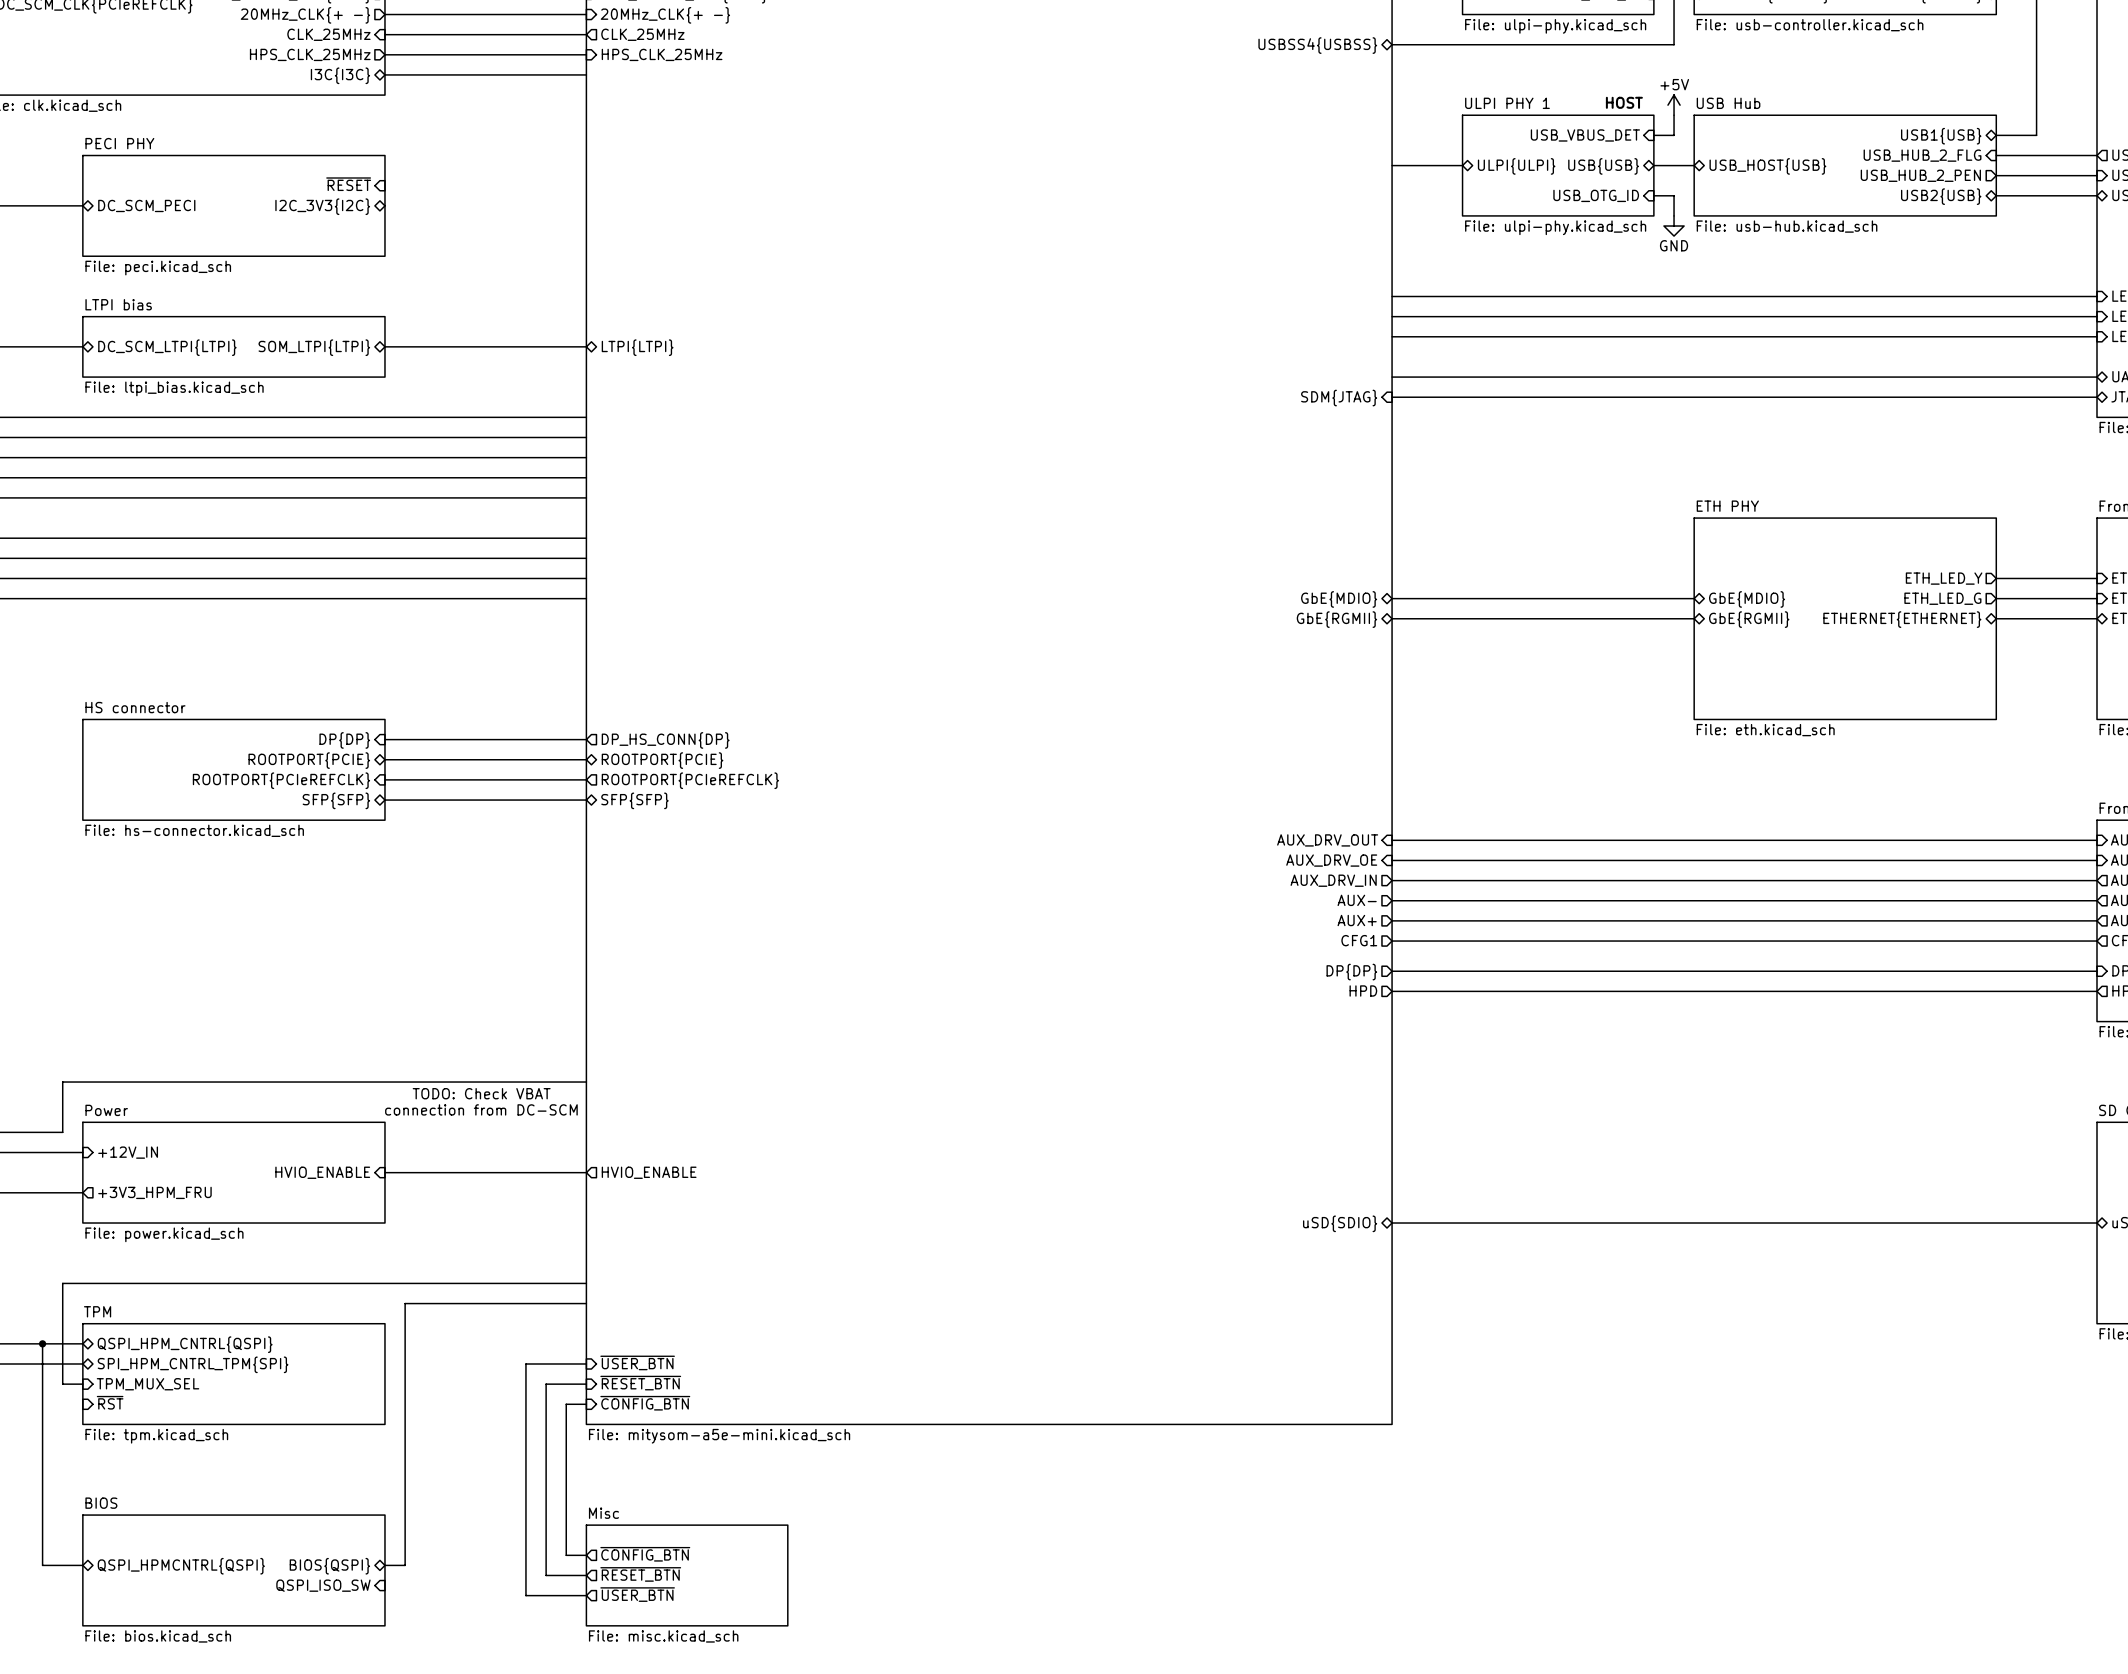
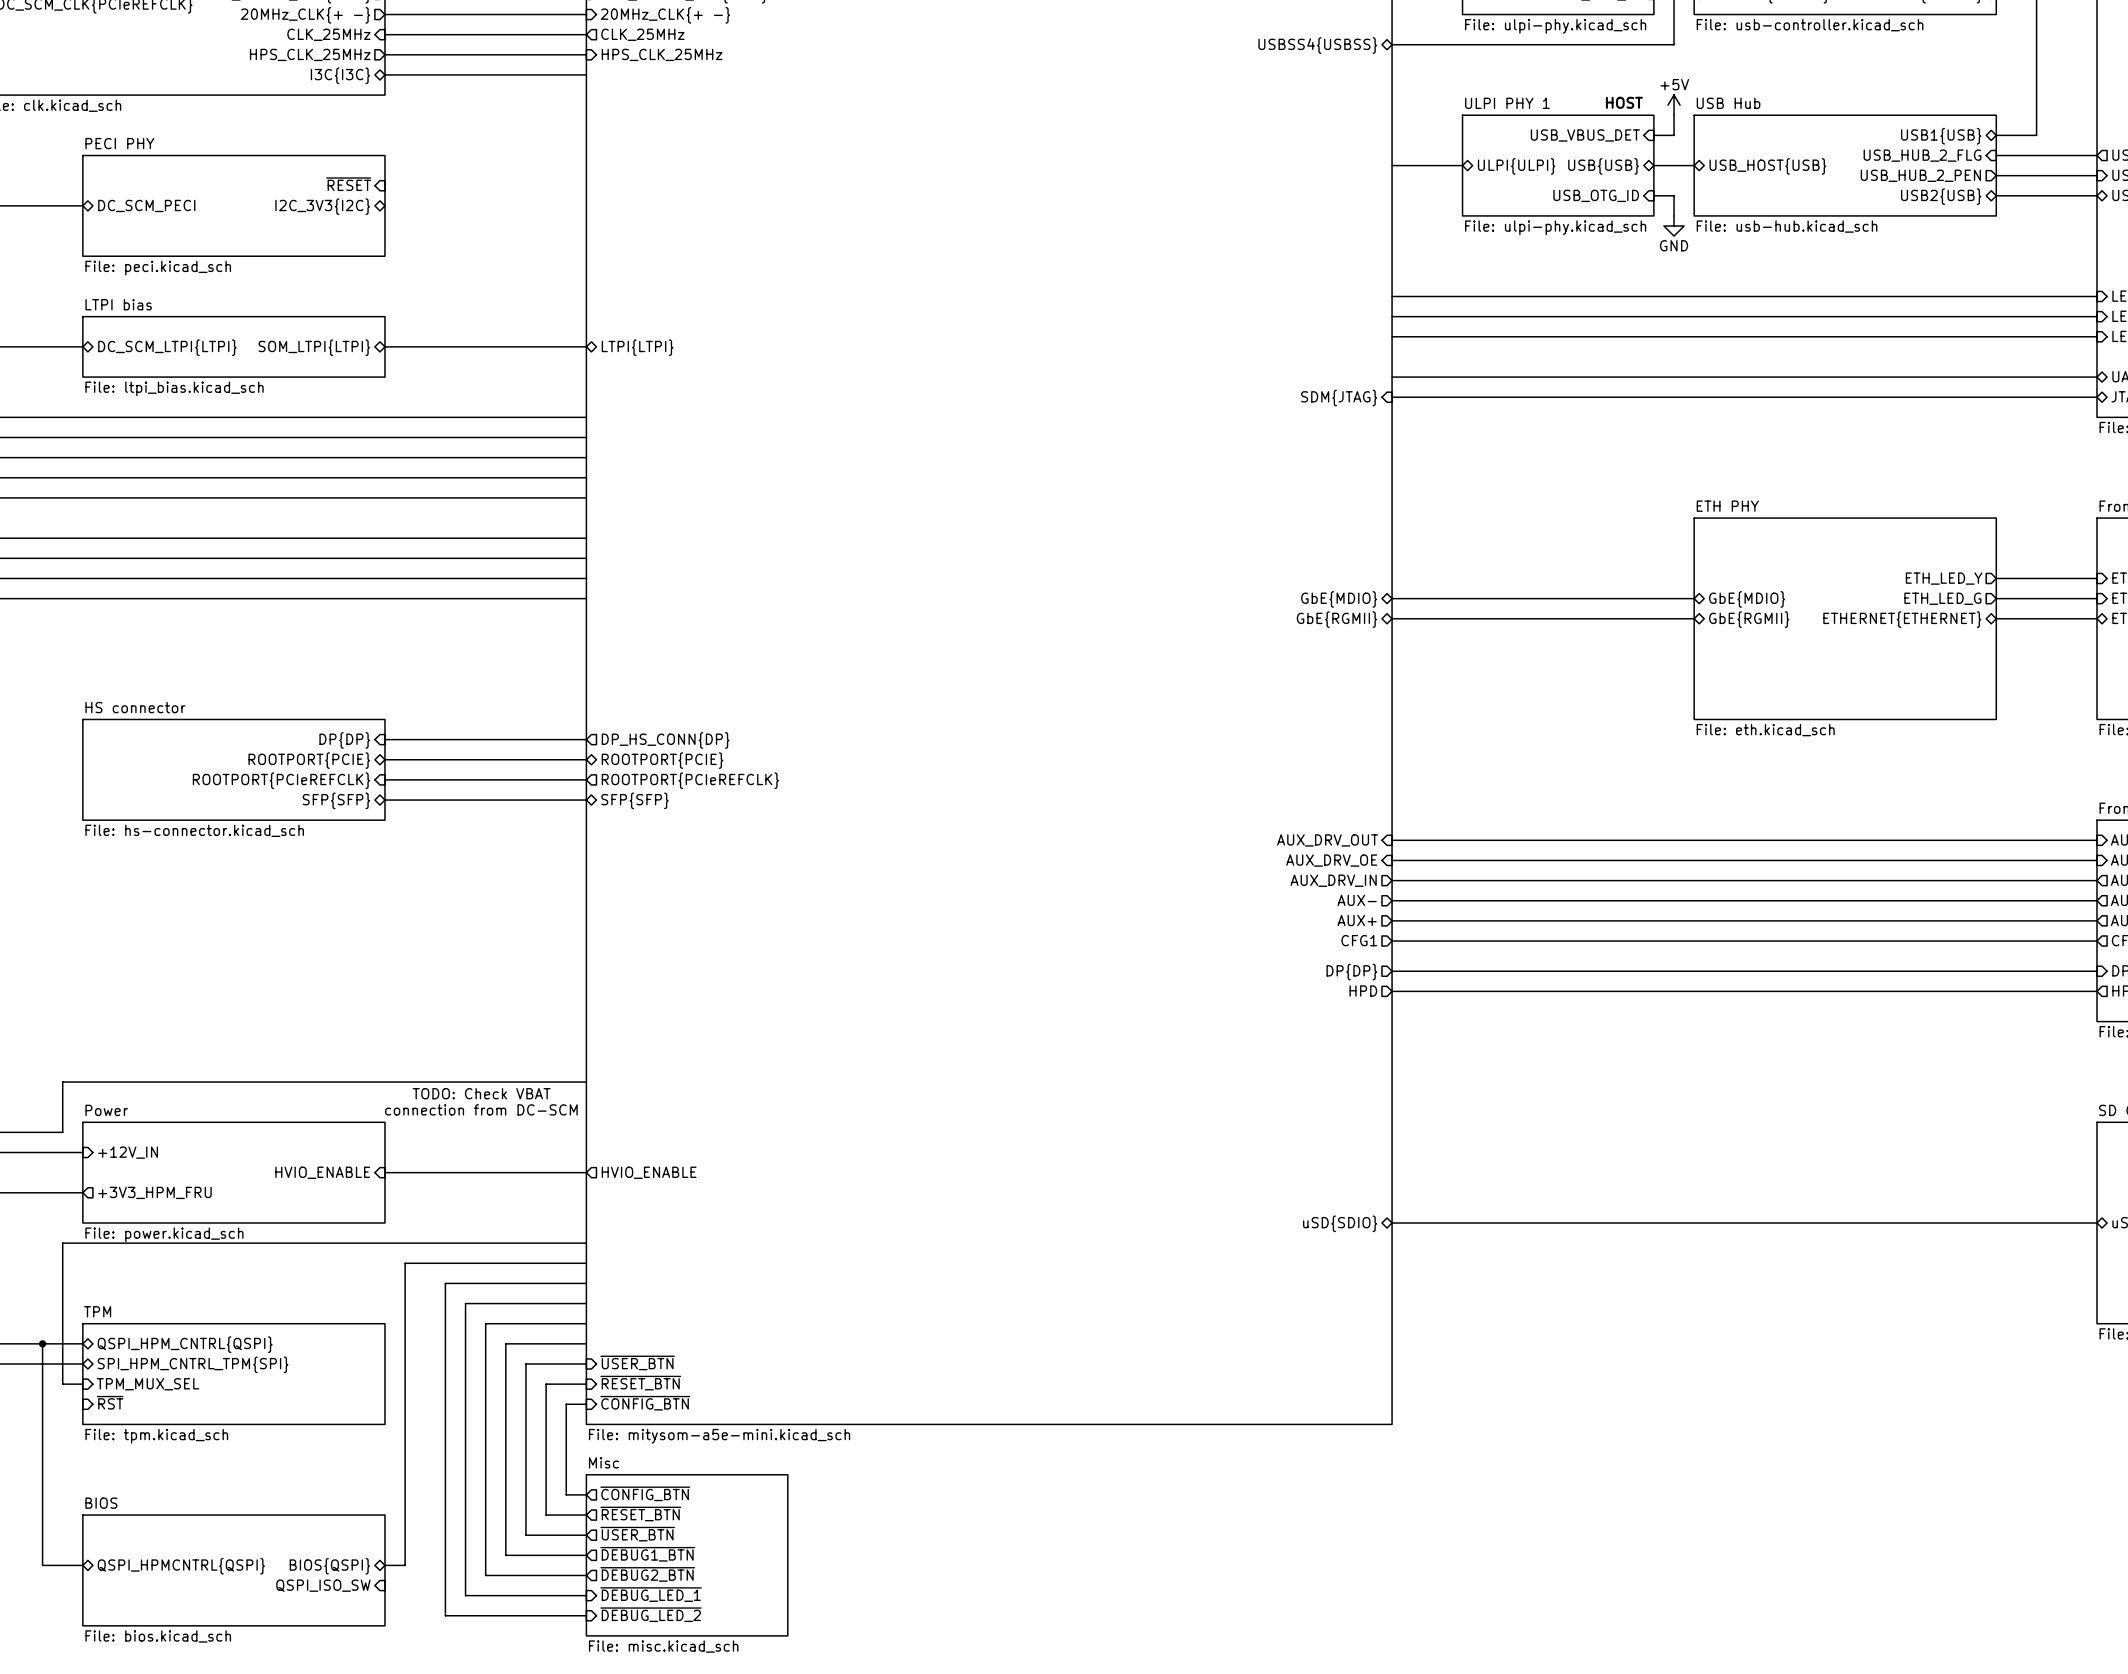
wire: (62, 1283) (445, 1283) -> (62, 1283) (62, 1243) (586, 1243)
wire: none -> (445, 1283) (445, 1615) (586, 1615)
bus: (405, 1303) (586, 1303) -> (405, 1303) (405, 1263) (586, 1263)
wire: none -> (586, 1303) (465, 1303) (465, 1595) (525, 1595)
wire: none -> (586, 1323) (485, 1323) (485, 1575) (546, 1575)
wire: none -> (586, 1343) (505, 1343) (505, 1555) (566, 1555)
sheet pin: none -> ~{CONFIG_BTN} (645, 1493)
wire: (566, 1494) (566, 1555) -> (566, 1494) (586, 1494)
sheet pin: none -> ~{RESET_BTN} (640, 1514)
wire: (546, 1515) (546, 1575) -> (546, 1515) (586, 1515)
sheet pin: none -> ~{USER_BTN} (637, 1534)
wire: (525, 1535) (525, 1595) -> (525, 1535) (586, 1535)
sheet pin: ~{CONFIG_BTN} (645, 1554) -> ~{DEBUG1_BTN} (647, 1554)
sheet Misc: none -> File: misc.kicad_sch (687, 1555)
sheet pin: ~{RESET_BTN} (640, 1574) -> ~{DEBUG2_BTN} (647, 1574)
sheet Misc: File: misc.kicad_sch (687, 1575) -> none
sheet pin shape: output (637, 1594) -> input (651, 1594)
sheet pin: ~{USER_BTN} (637, 1594) -> ~{DEBUG_LED_1} (651, 1594)
sheet pin: none -> ~{DEBUG_LED_2} (651, 1614)

